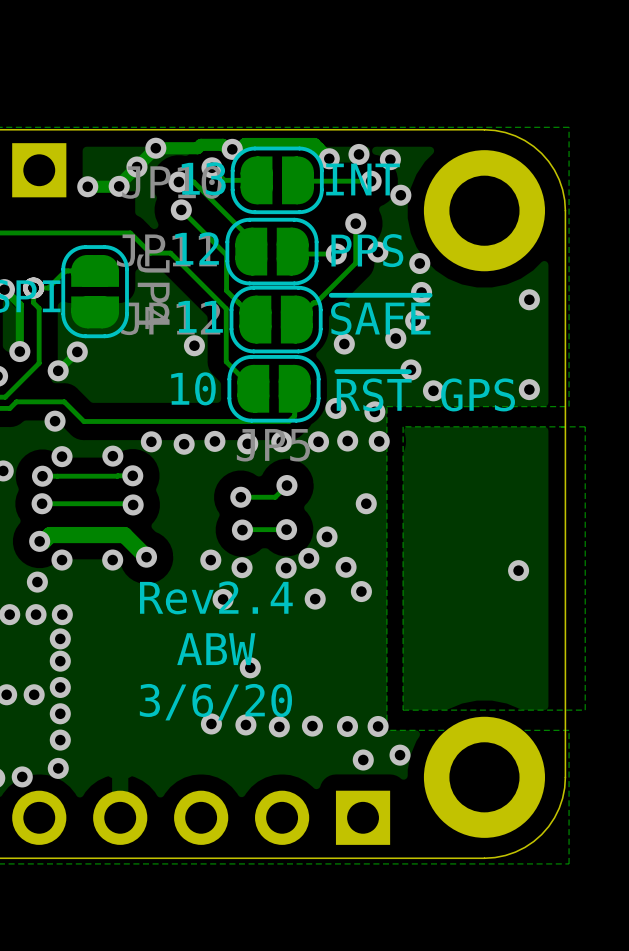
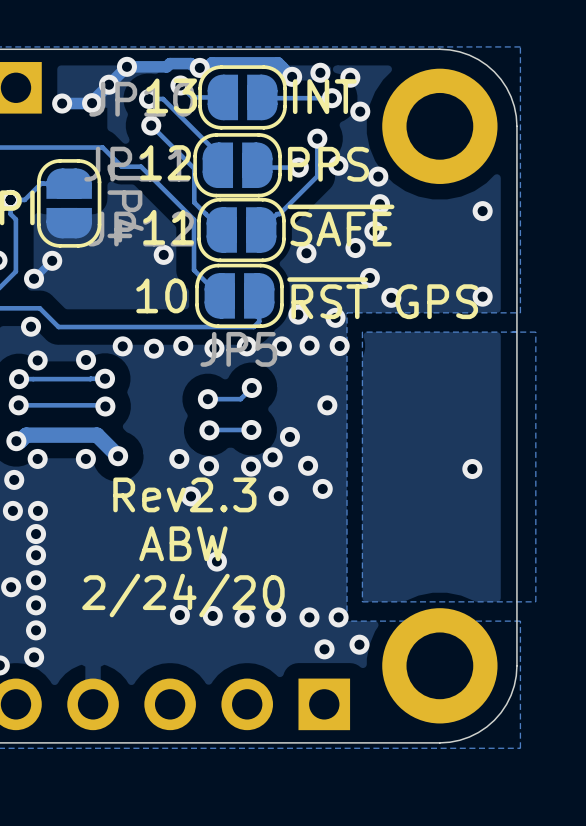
text: Rev2.4 (216, 597) -> Rev2.3 (184, 494)
text: 3/6/20 (215, 702) -> 2/24/20 (183, 595)

